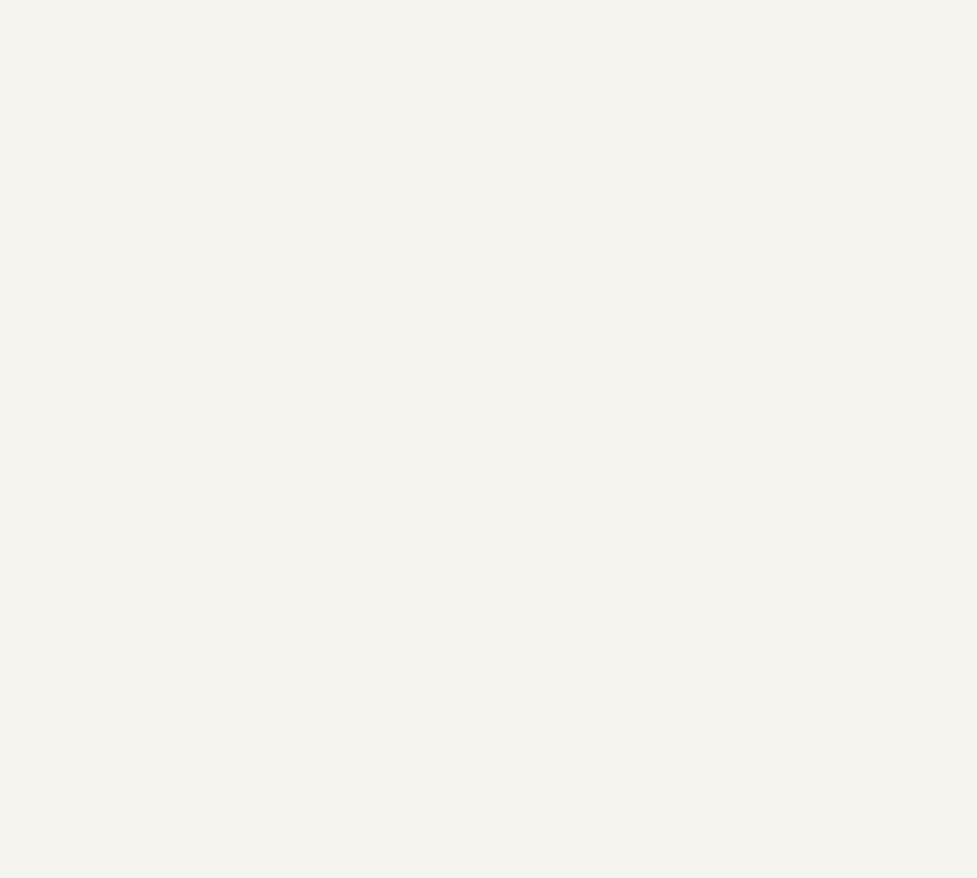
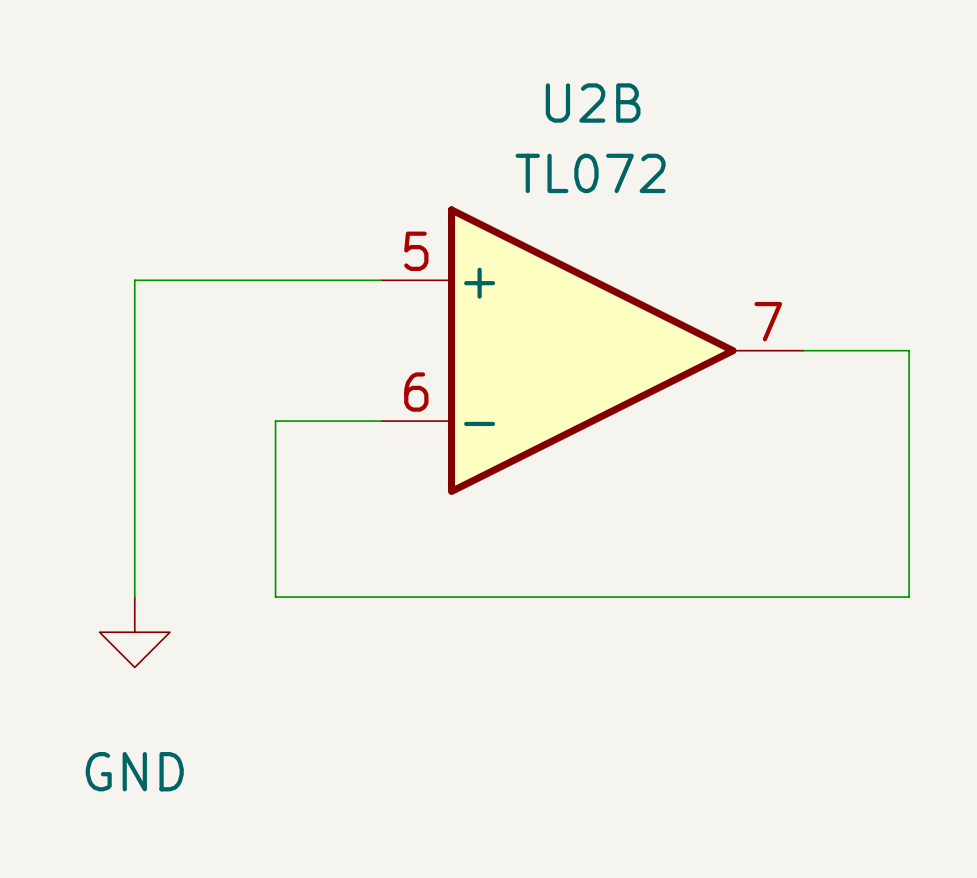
wire: none -> (381, 280) (134, 280) (134, 597)
U2B: none -> TL072 (592, 350)
wire: none -> (803, 350) (909, 350) (909, 597) (275, 597) (275, 421) (381, 421)
power symbol: none -> GND (134, 632)

